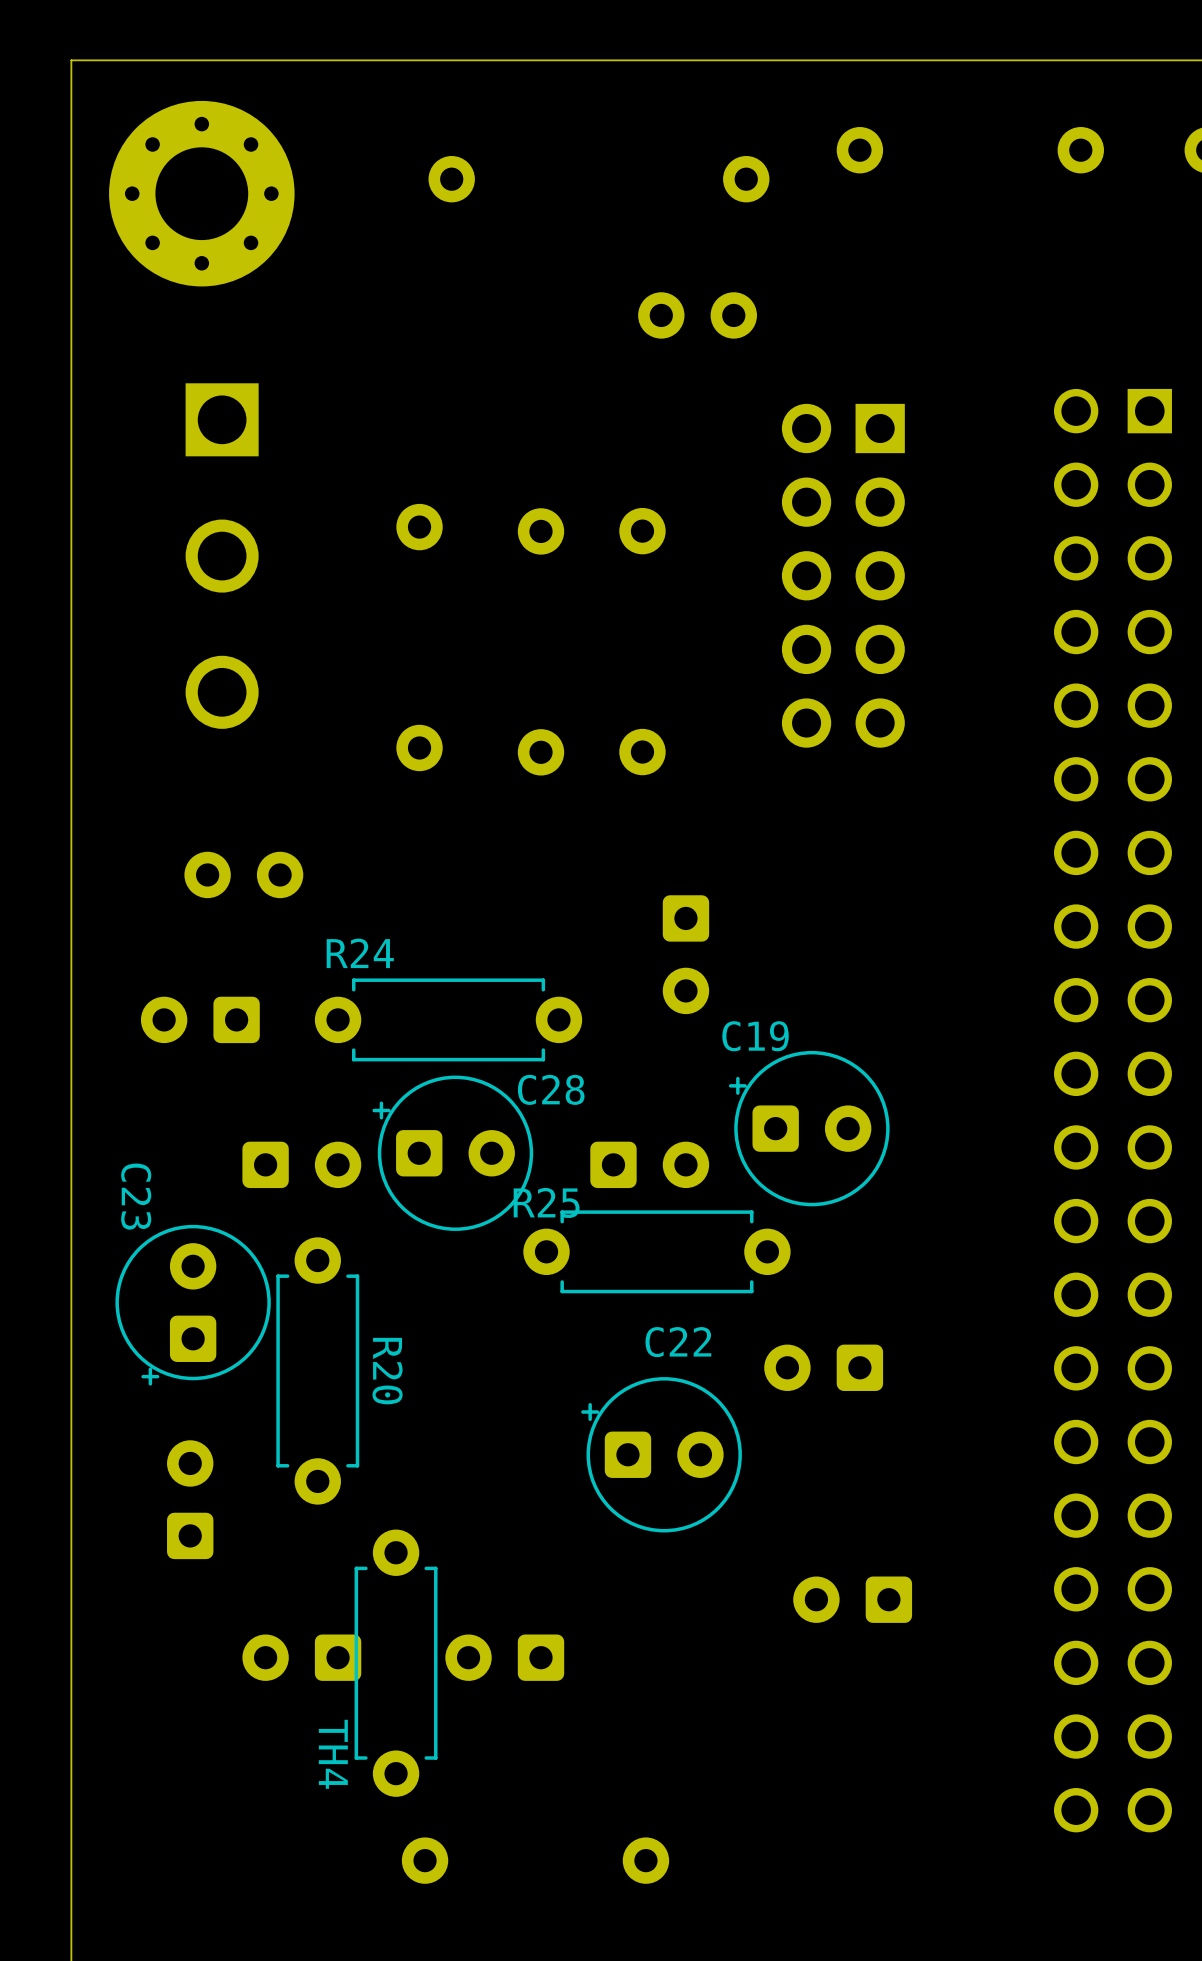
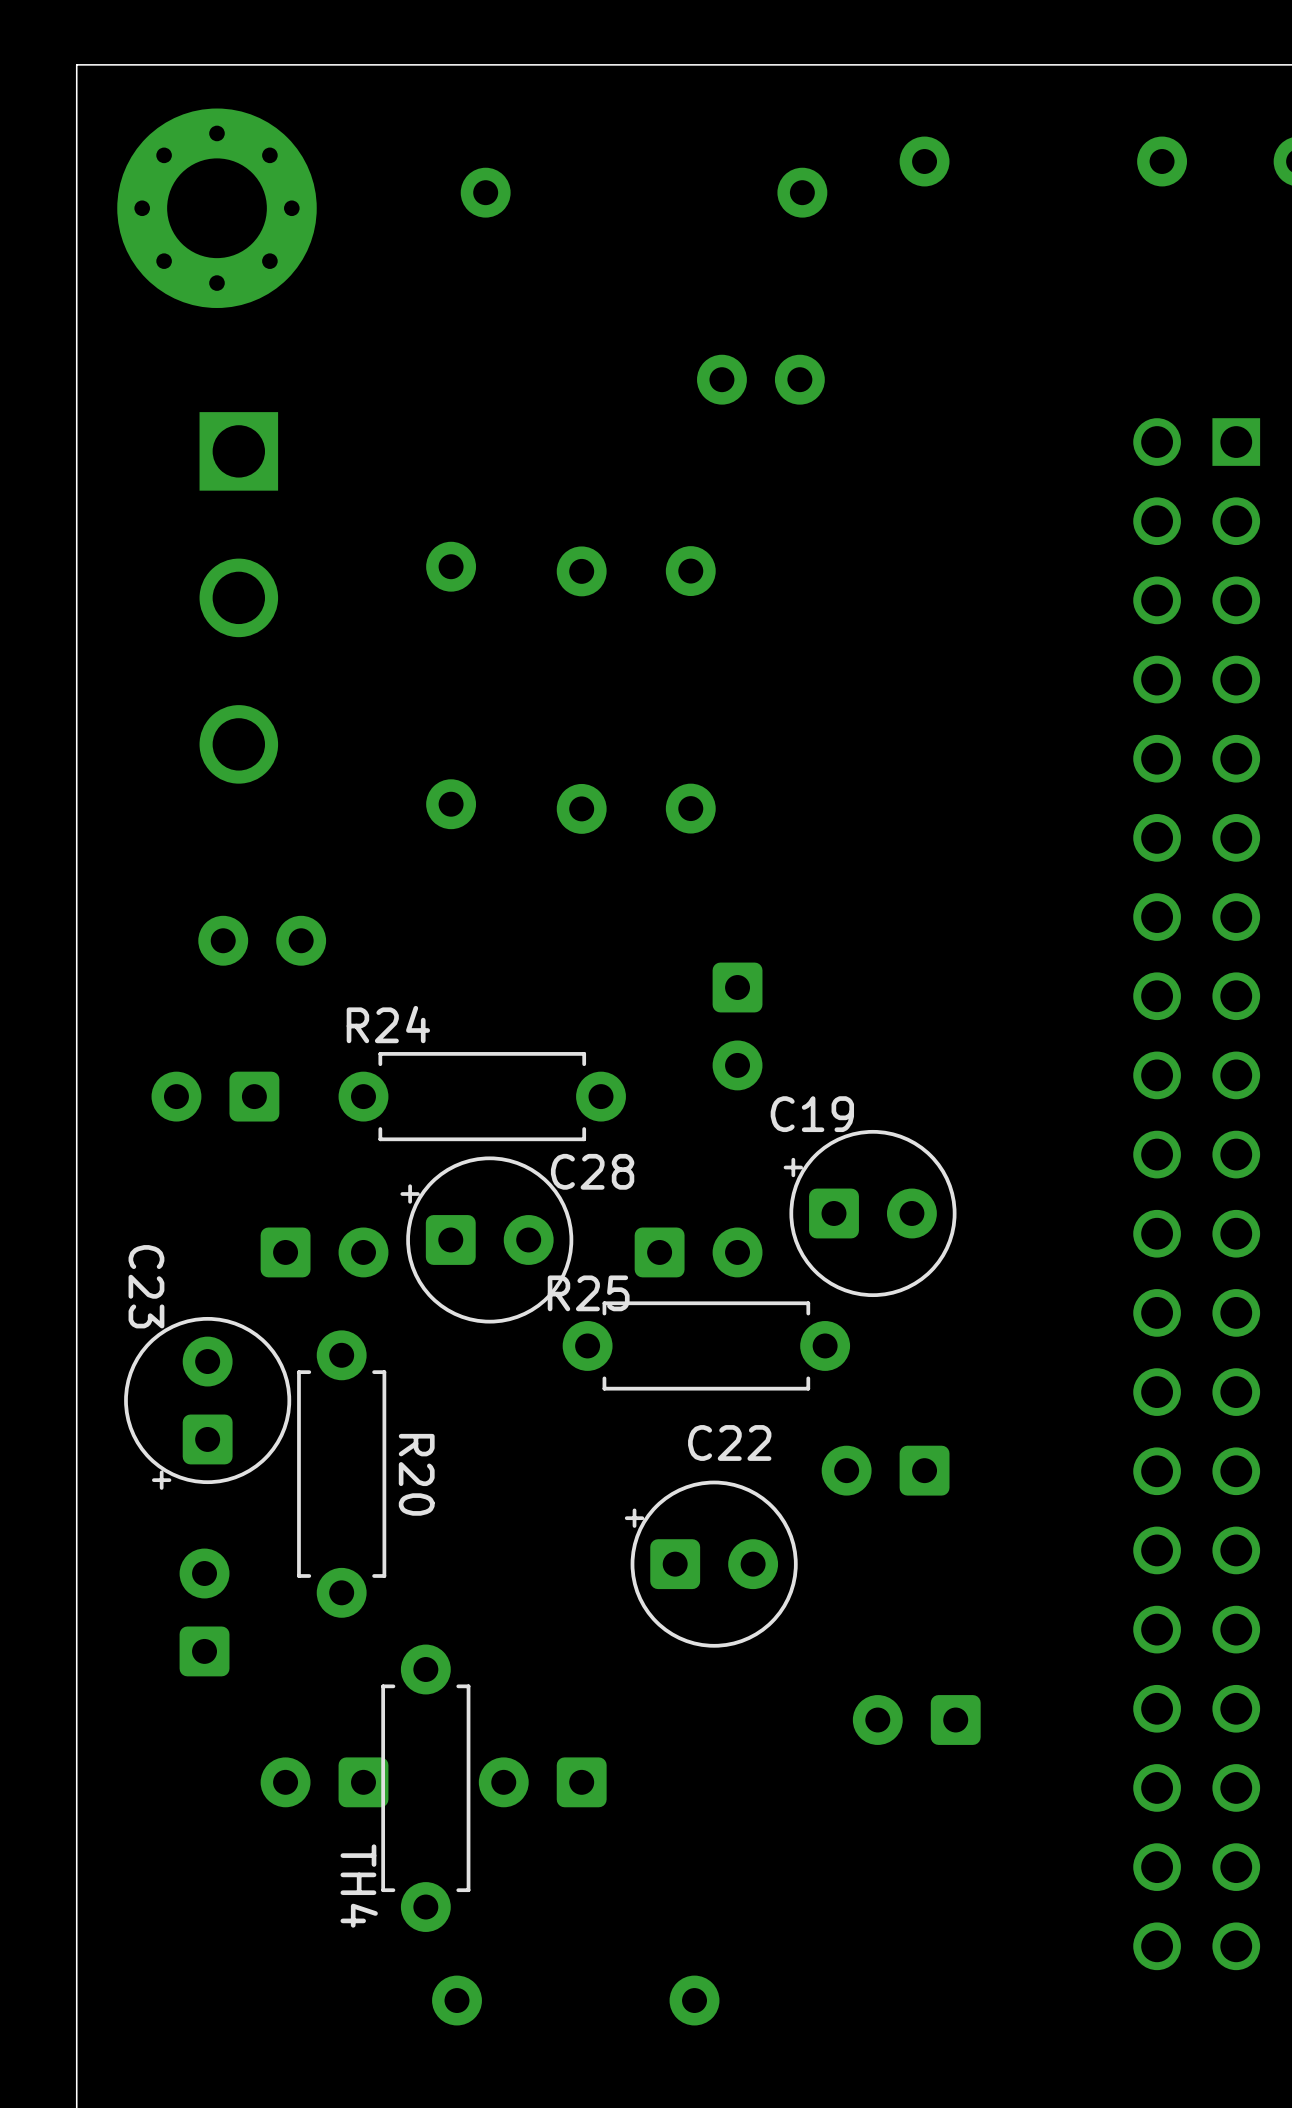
part position: (697, 315) -> (760, 379)
part: (843, 575) -> none

